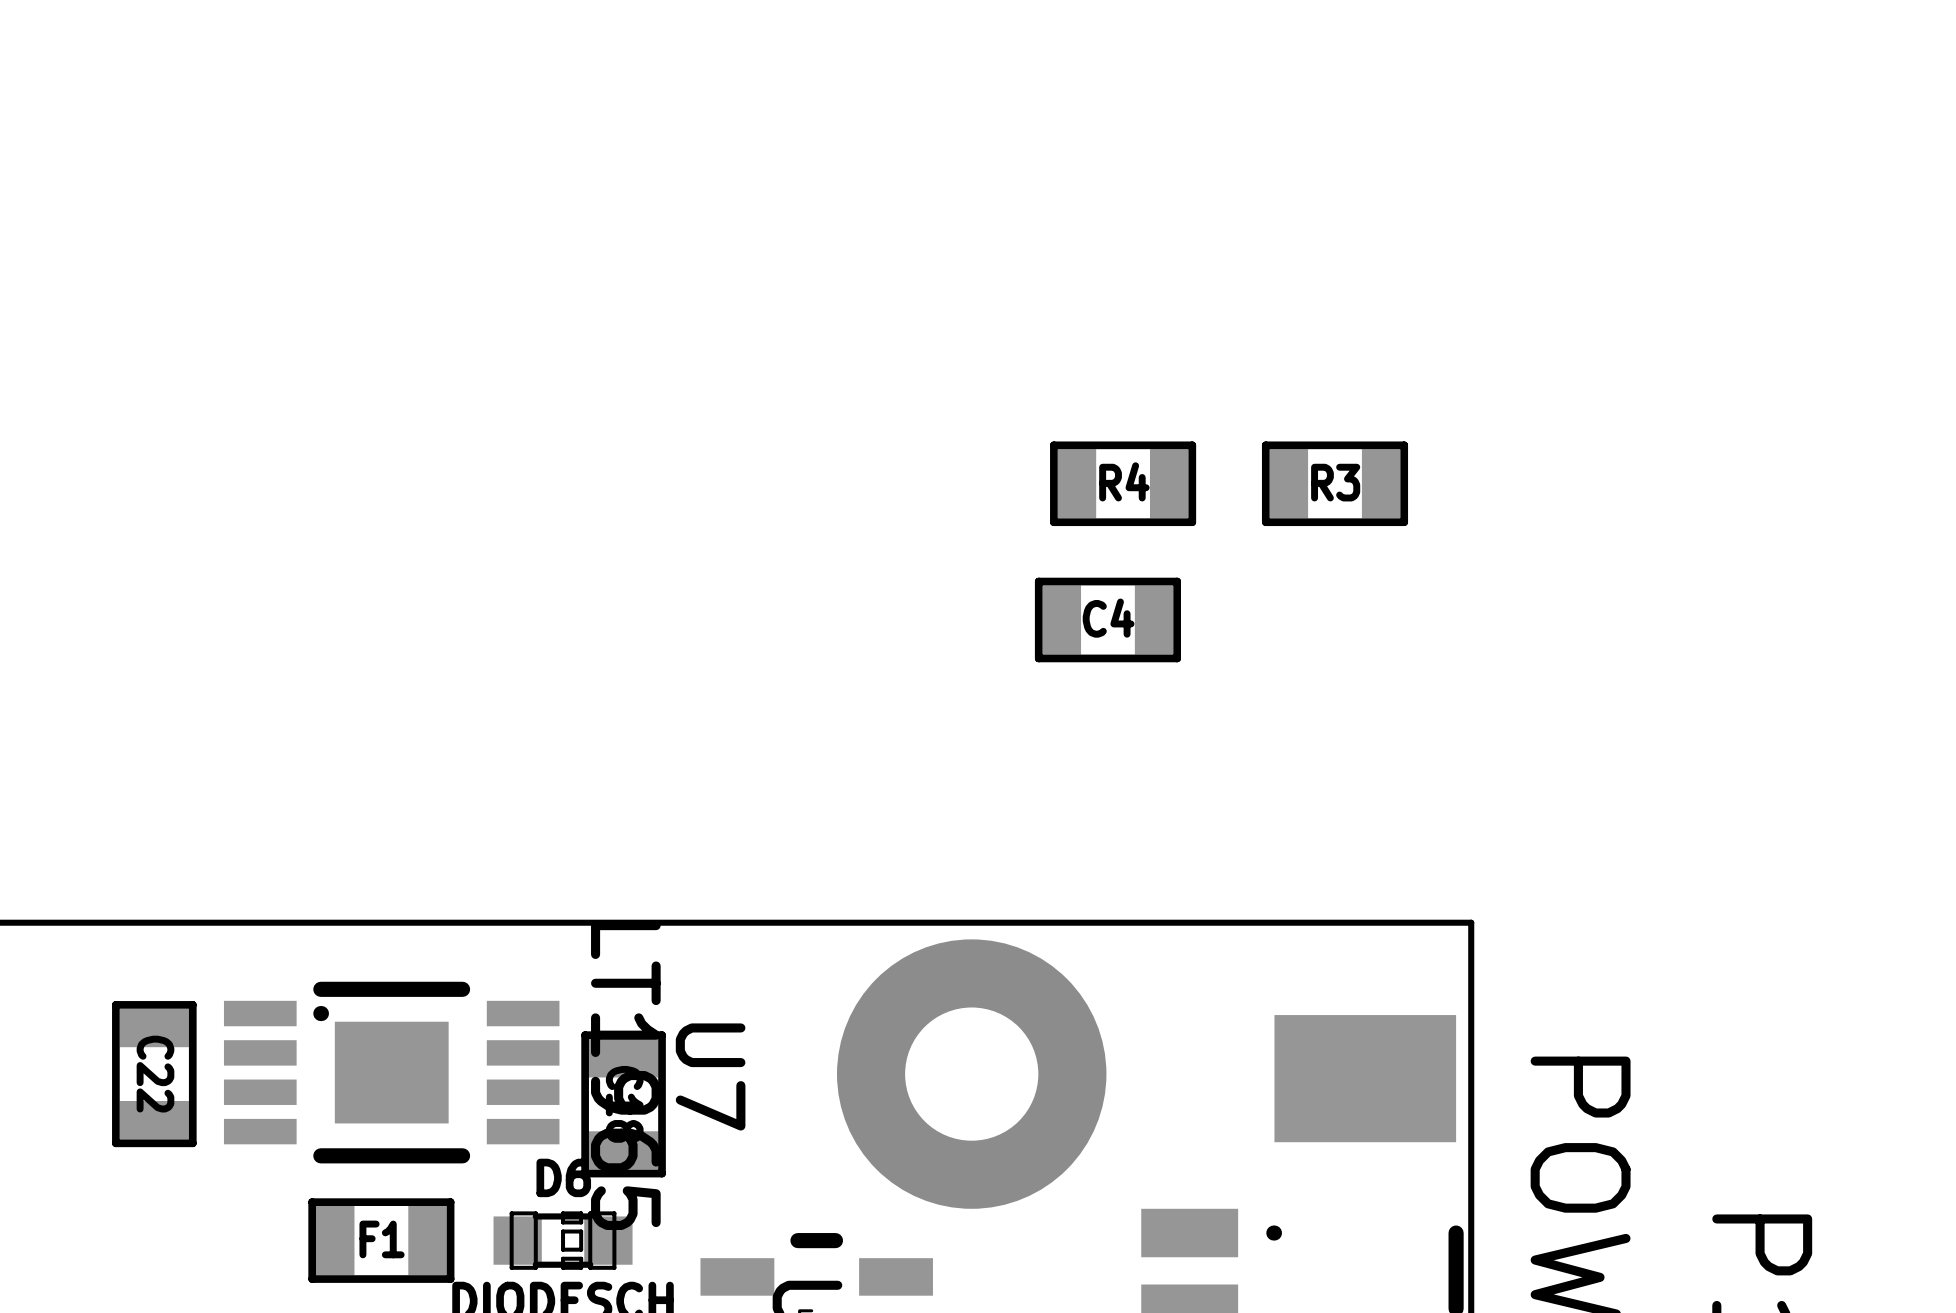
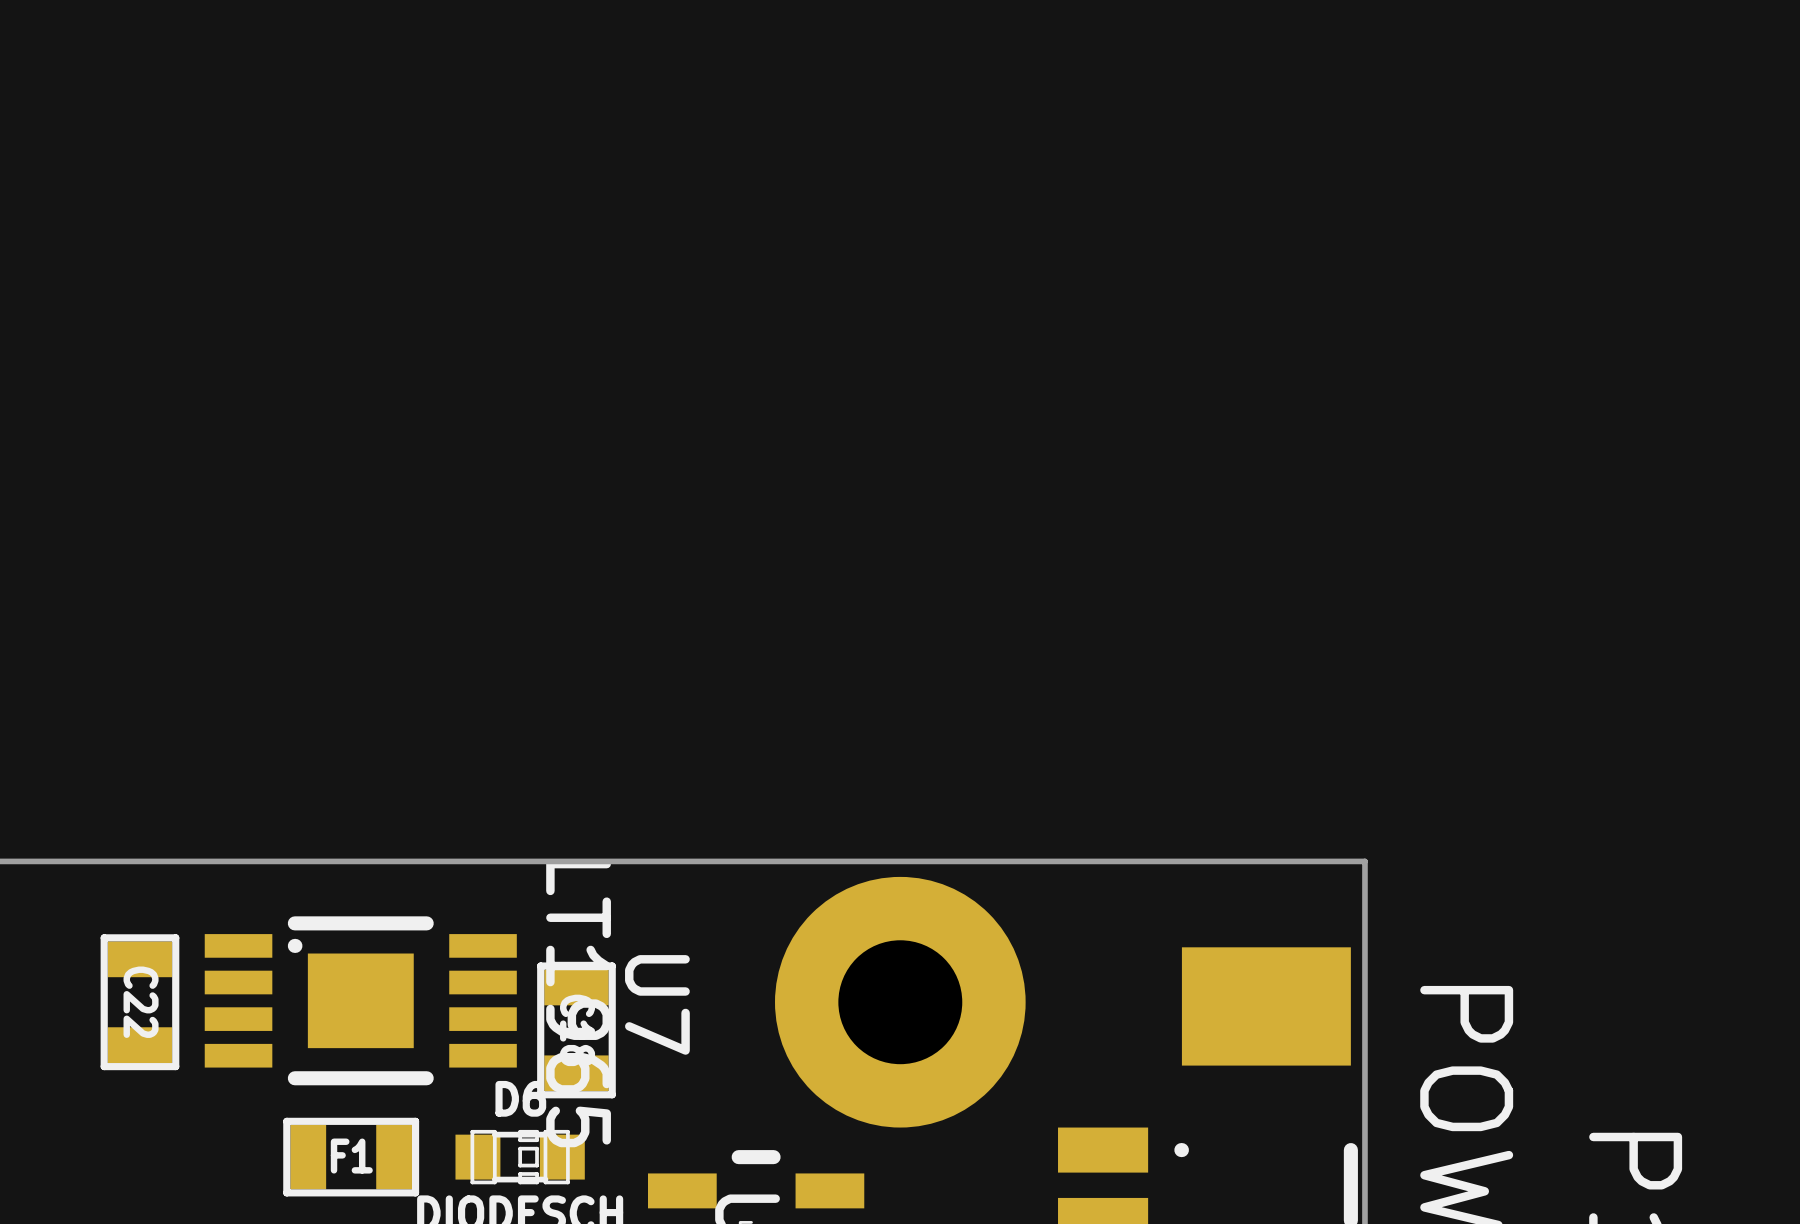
R4: (1123, 483) -> none
R3: (1335, 483) -> none
C4: (1107, 619) -> none

